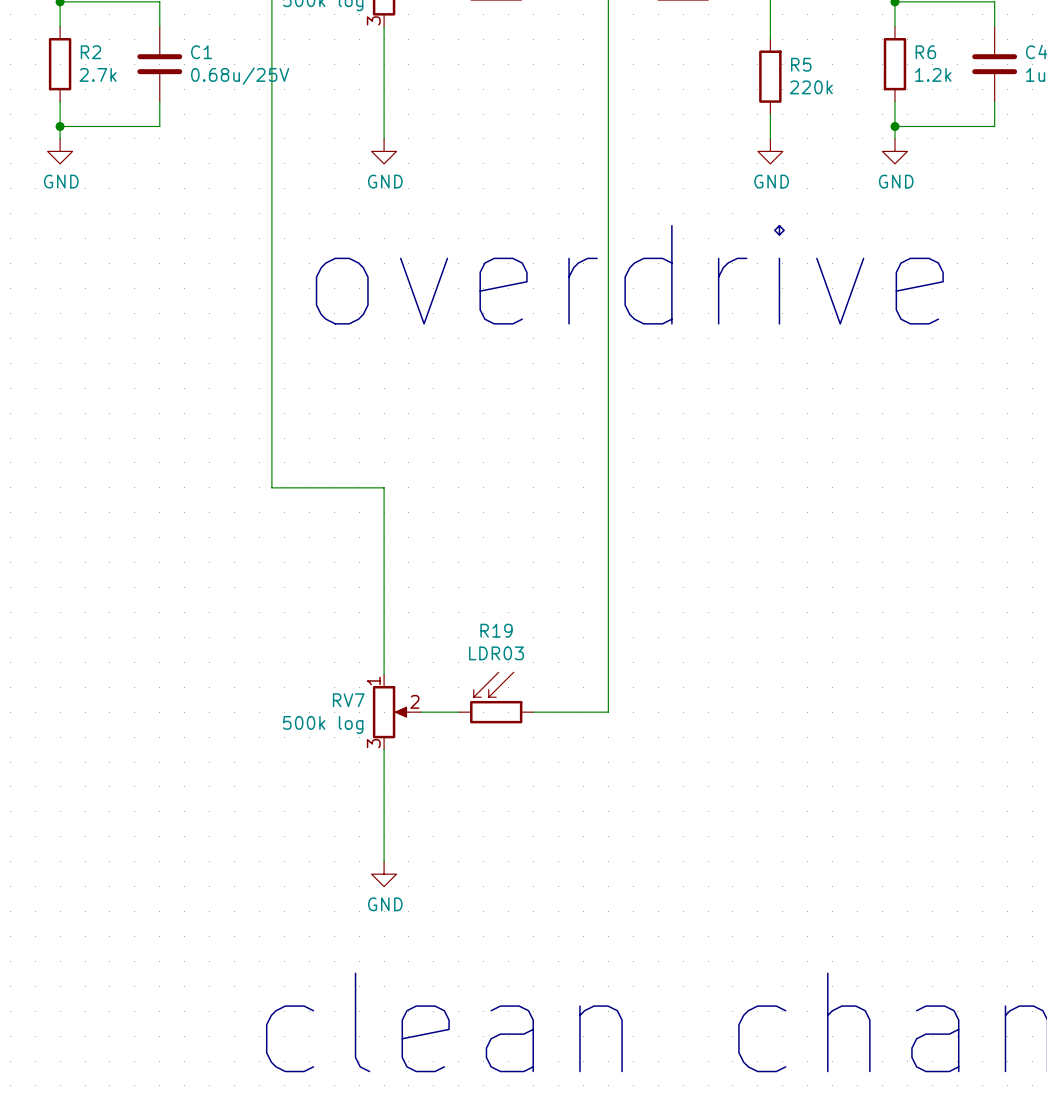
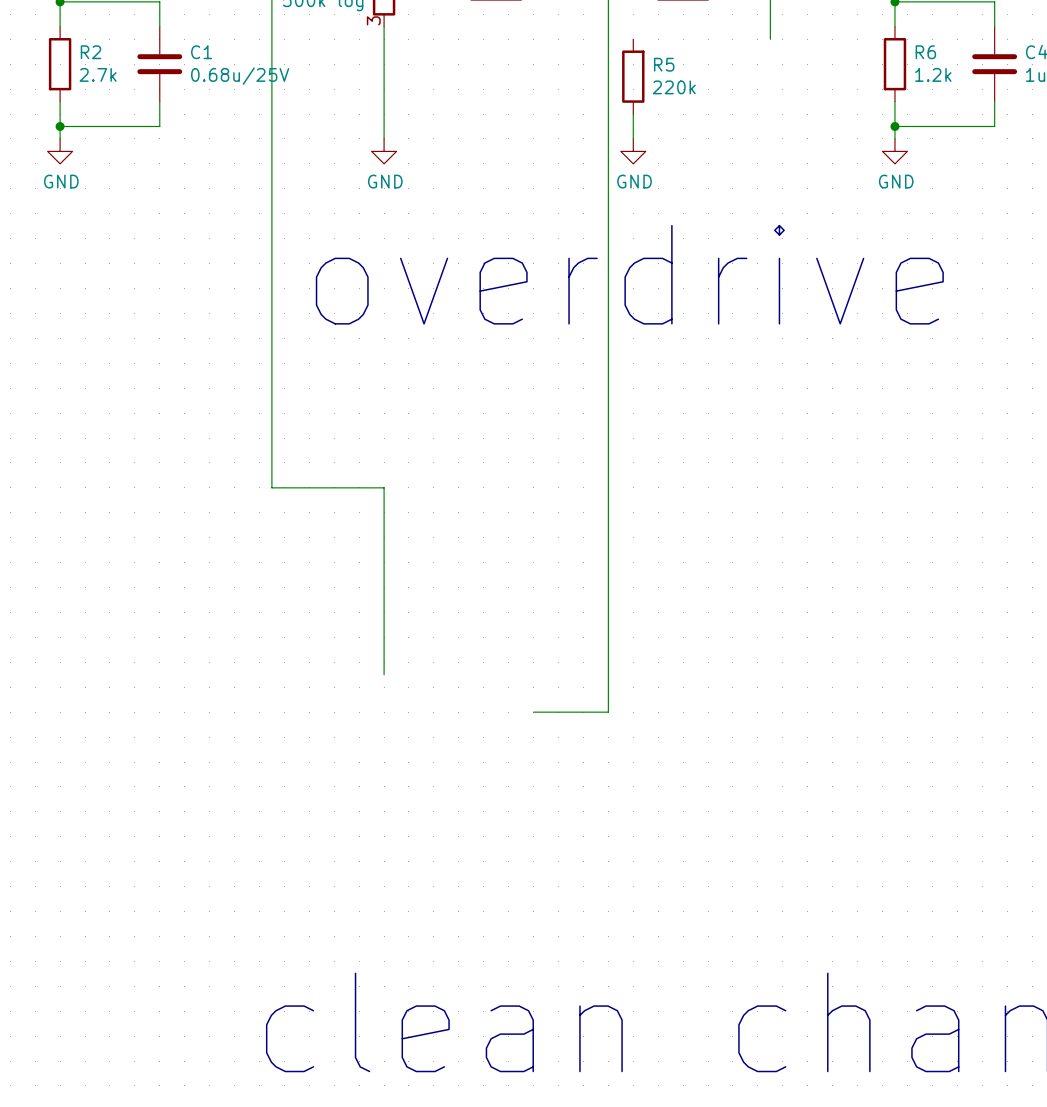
R5 position: (770, 76) -> (633, 76)
wire: (770, 114) (770, 138) -> (633, 114) (633, 138)
power symbol position: GND (770, 151) -> GND (633, 151)
R19: LDR03 (496, 697) -> none
RV7: 500k log (397, 712) -> none
wire: (421, 712) (458, 712) -> none
wire: (384, 749) (384, 861) -> none
power symbol: GND (384, 874) -> none

